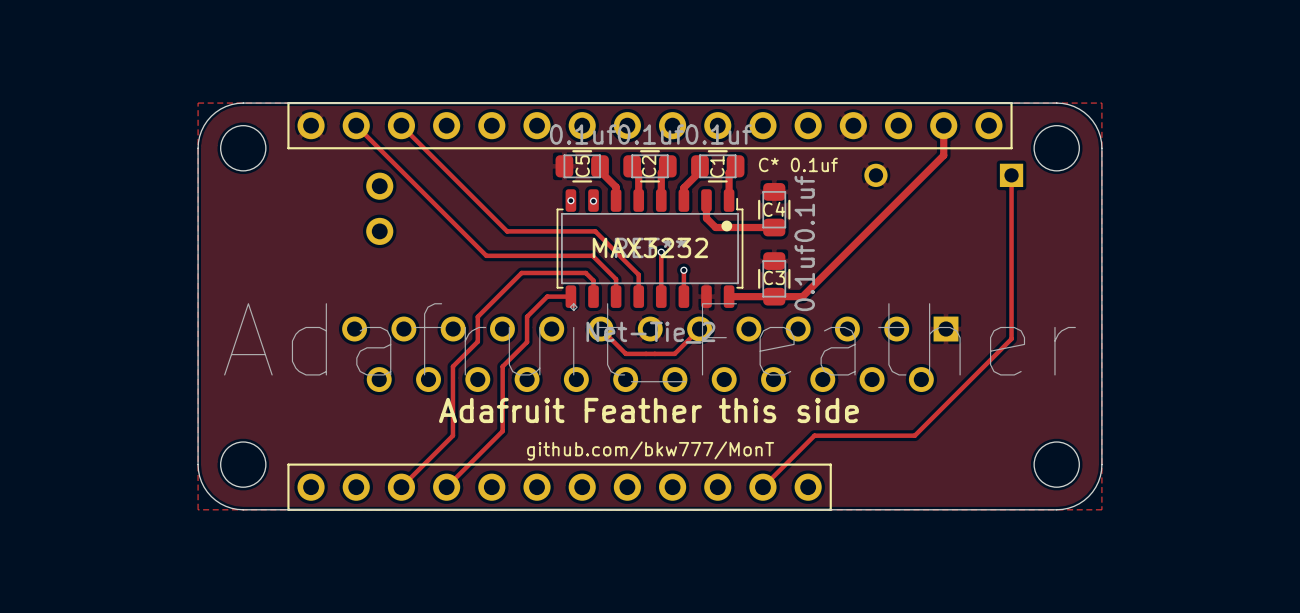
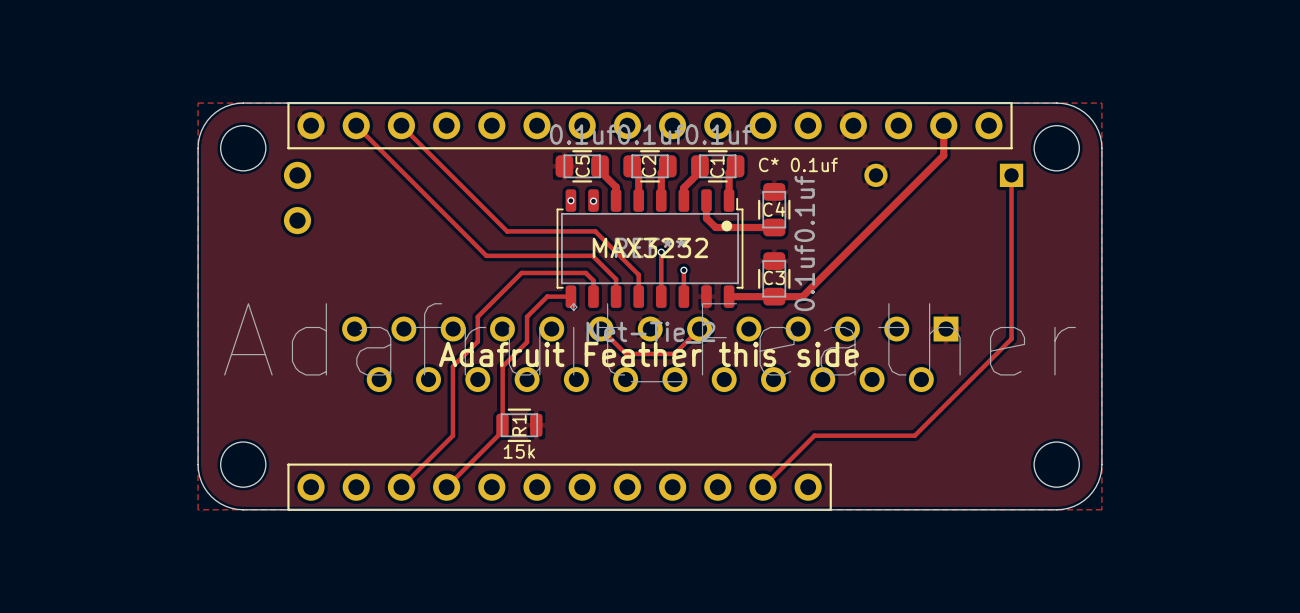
part: none -> (297, 197)
part: (379, 208) -> none
text position: Adafruit Feather this side (648, 410) -> Adafruit Feather this side (648, 354)
R1: none -> 15k (519, 425)
text: github.com/bkw777/MonT (650, 450) -> none

